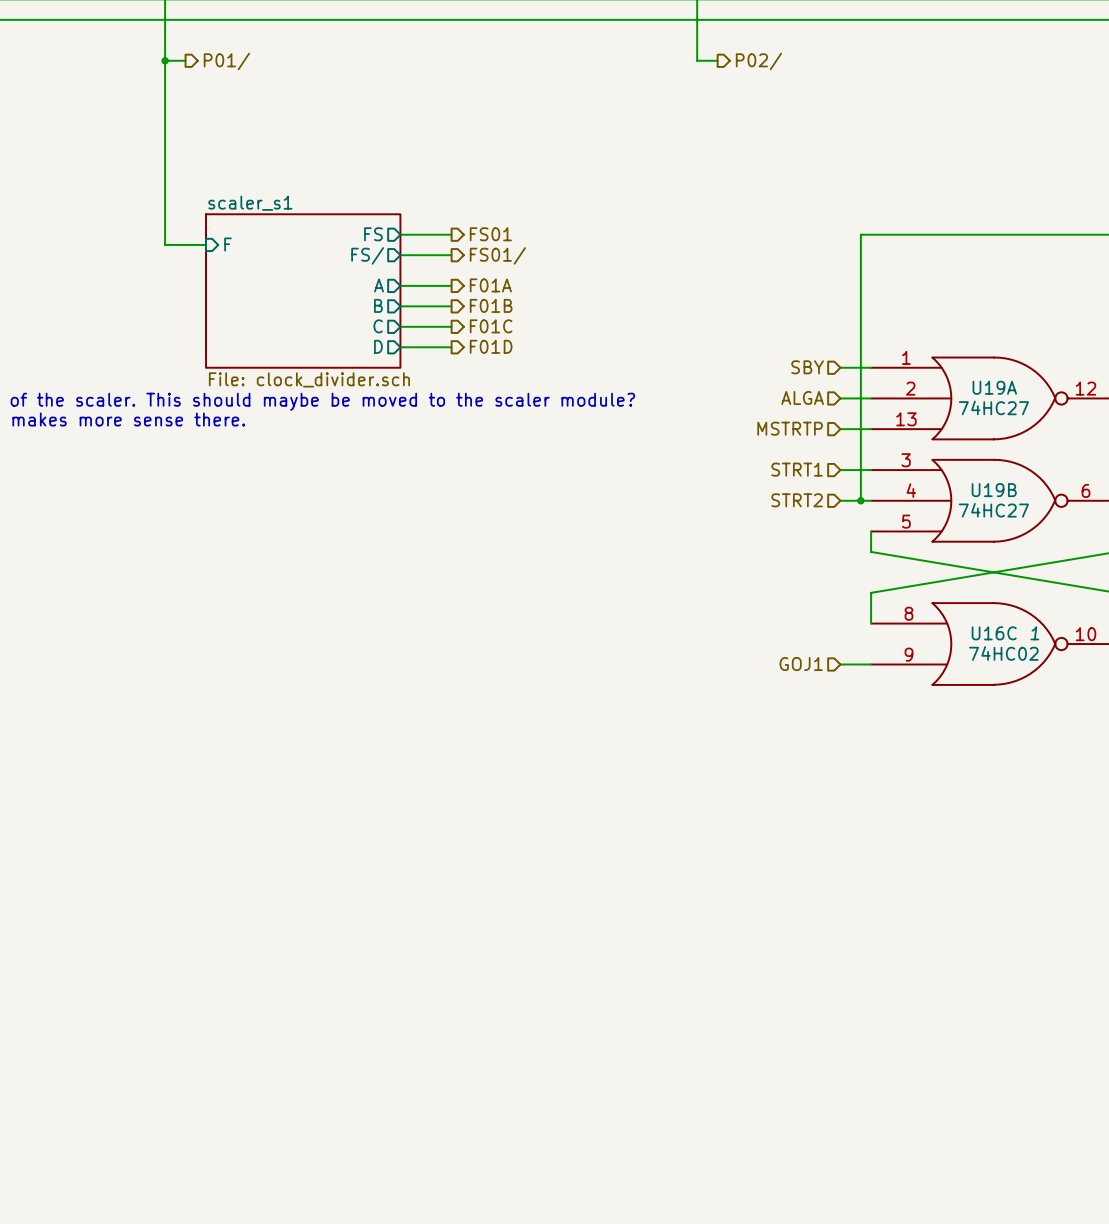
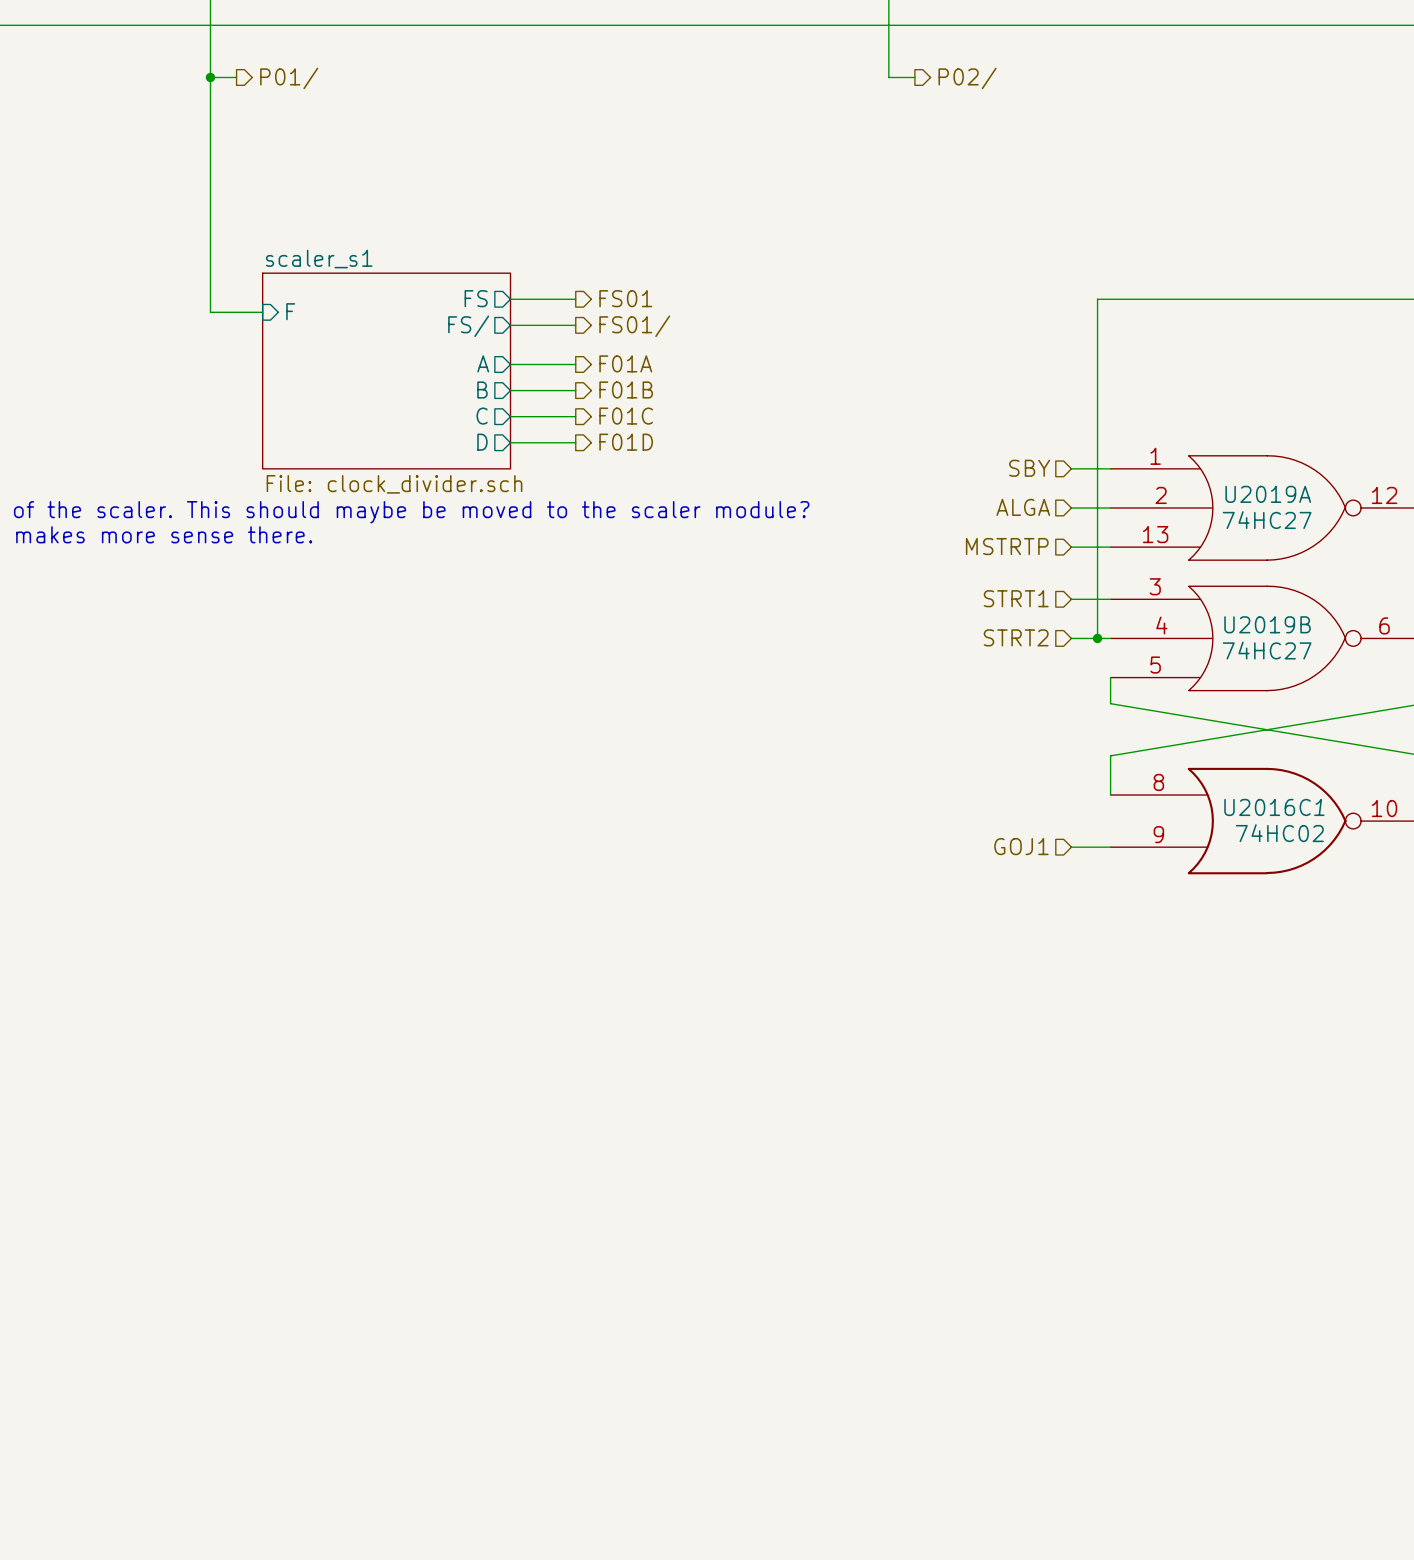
U19A name: U19A (994, 387) -> U2019A (1268, 494)
U19B name: U19B (994, 490) -> U2019B (1267, 624)
U16C name: U16C (994, 633) -> U2016C (1267, 807)

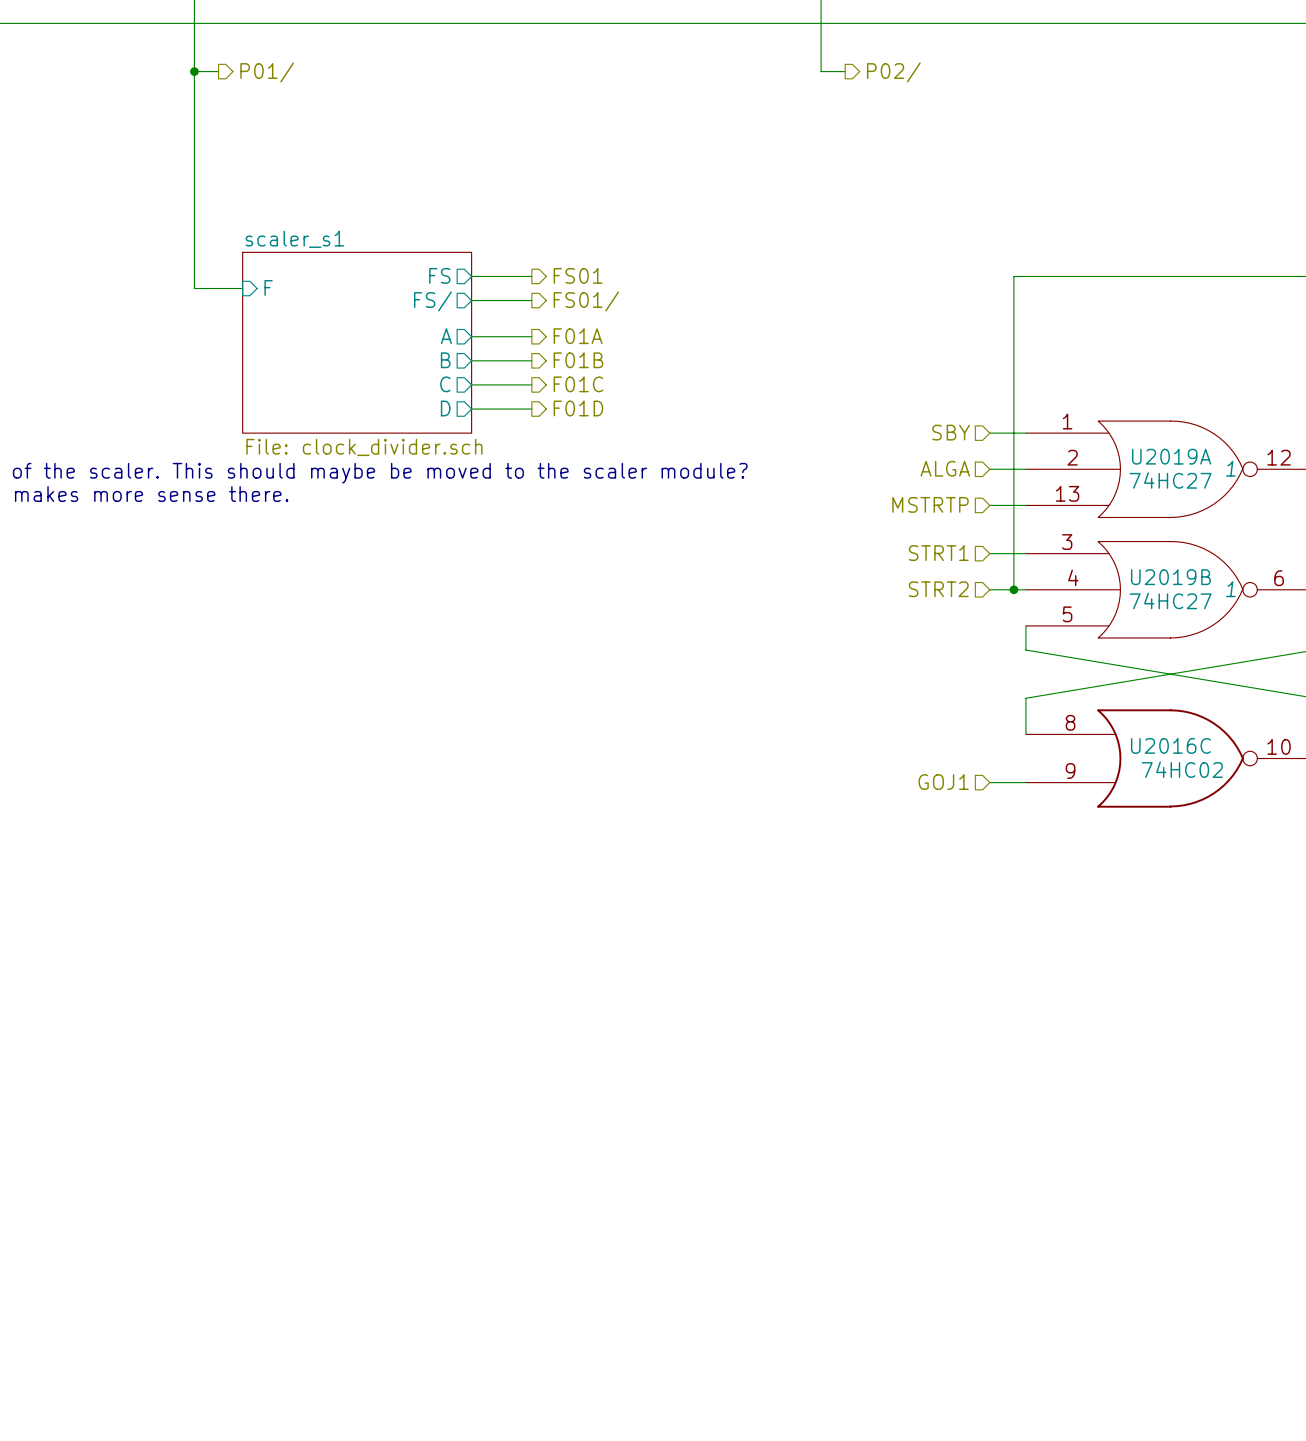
U2019A text: none -> 1 (1230, 468)
U2019B text: none -> 1 (1230, 589)
U2016C text: 1 (1319, 807) -> none

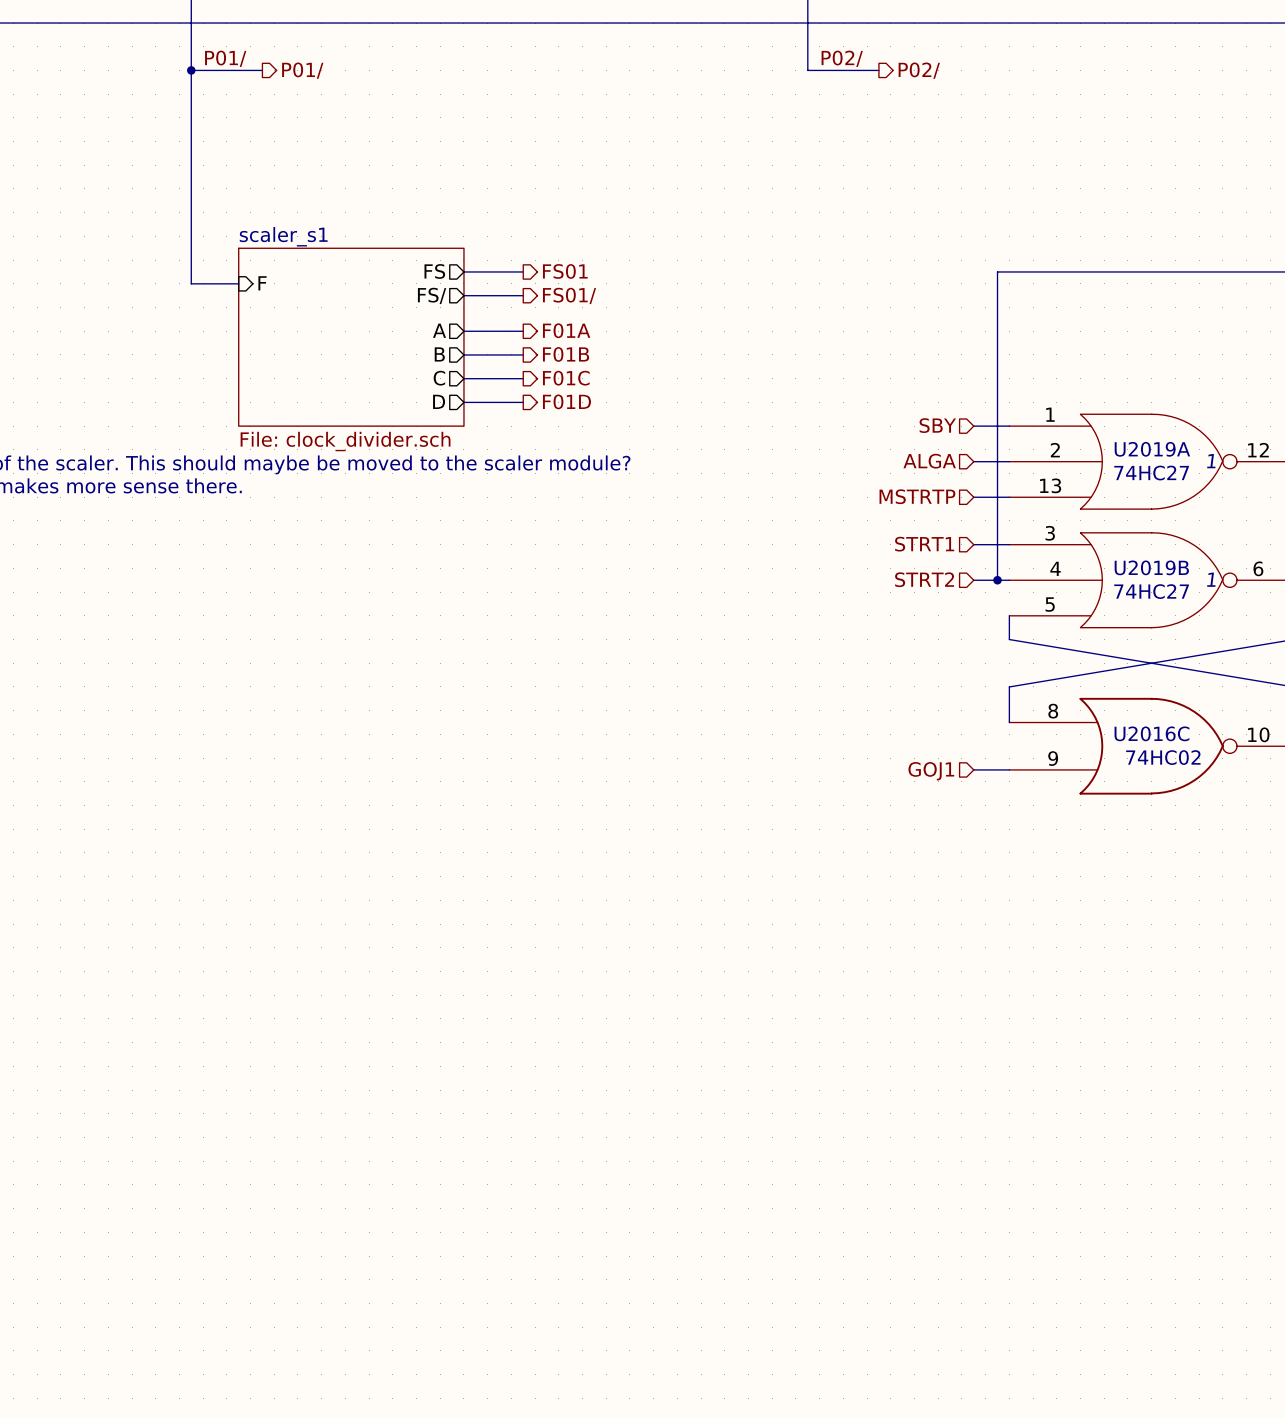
label: none -> P01/ (225, 58)
label: none -> P02/ (842, 58)
wire: none -> (215, 70) (262, 70)
wire: none -> (831, 70) (878, 70)
hierarchical label position: P01/ (267, 72) -> P01/ (302, 70)
hierarchical label position: P02/ (893, 72) -> P02/ (919, 70)

